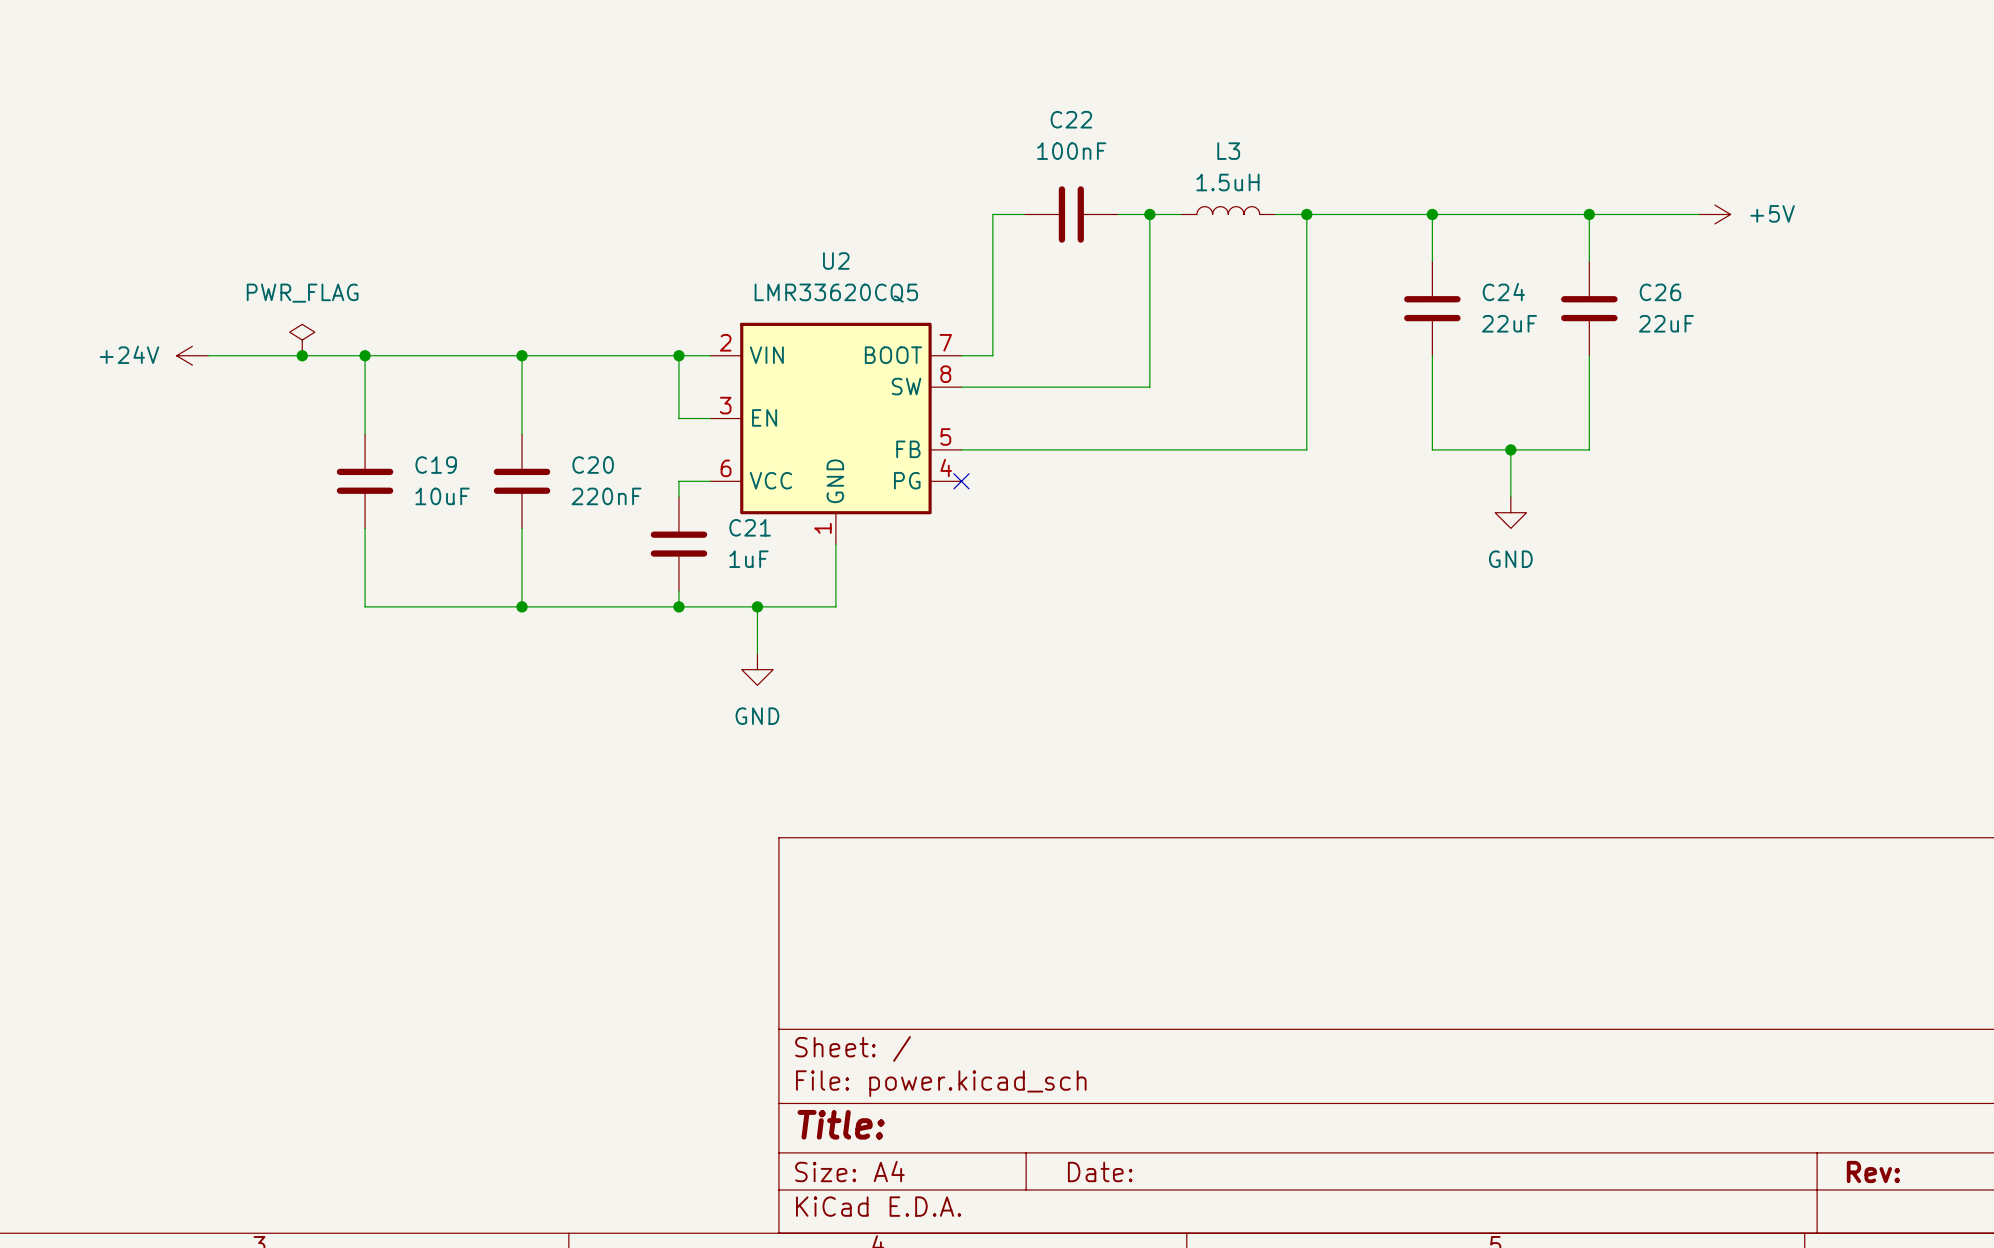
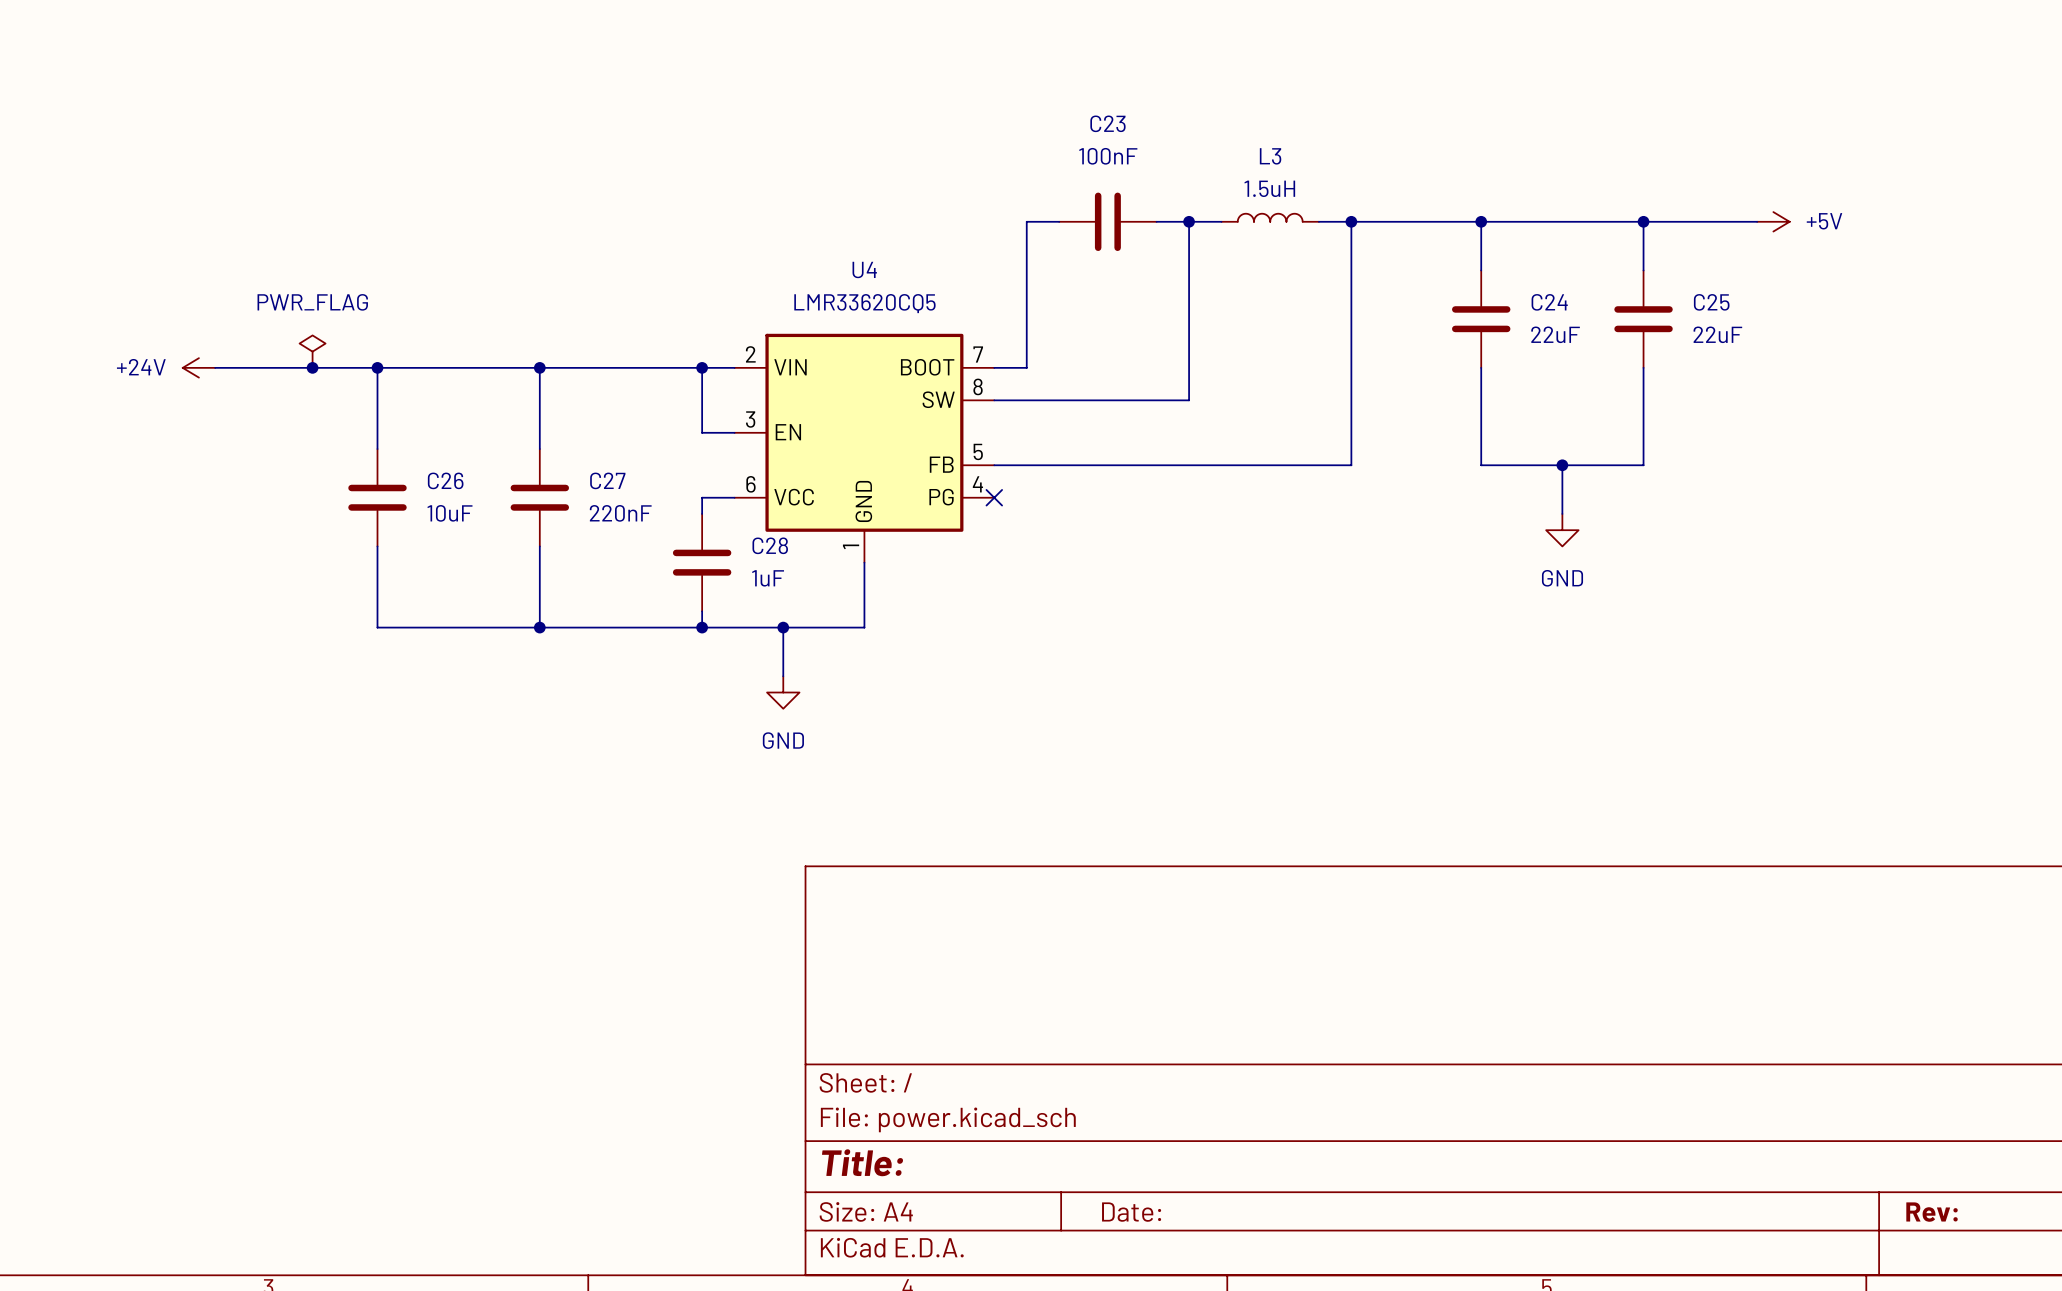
C22 name: C22 (1071, 119) -> C23 (1107, 123)
U2 name: U2 (836, 260) -> U4 (864, 269)
C26 name: C26 (1660, 292) -> C25 (1711, 302)
C19 name: C19 (436, 465) -> C26 (445, 480)
C20 name: C20 (593, 465) -> C27 (607, 480)
C21 name: C21 (750, 527) -> C28 (770, 545)

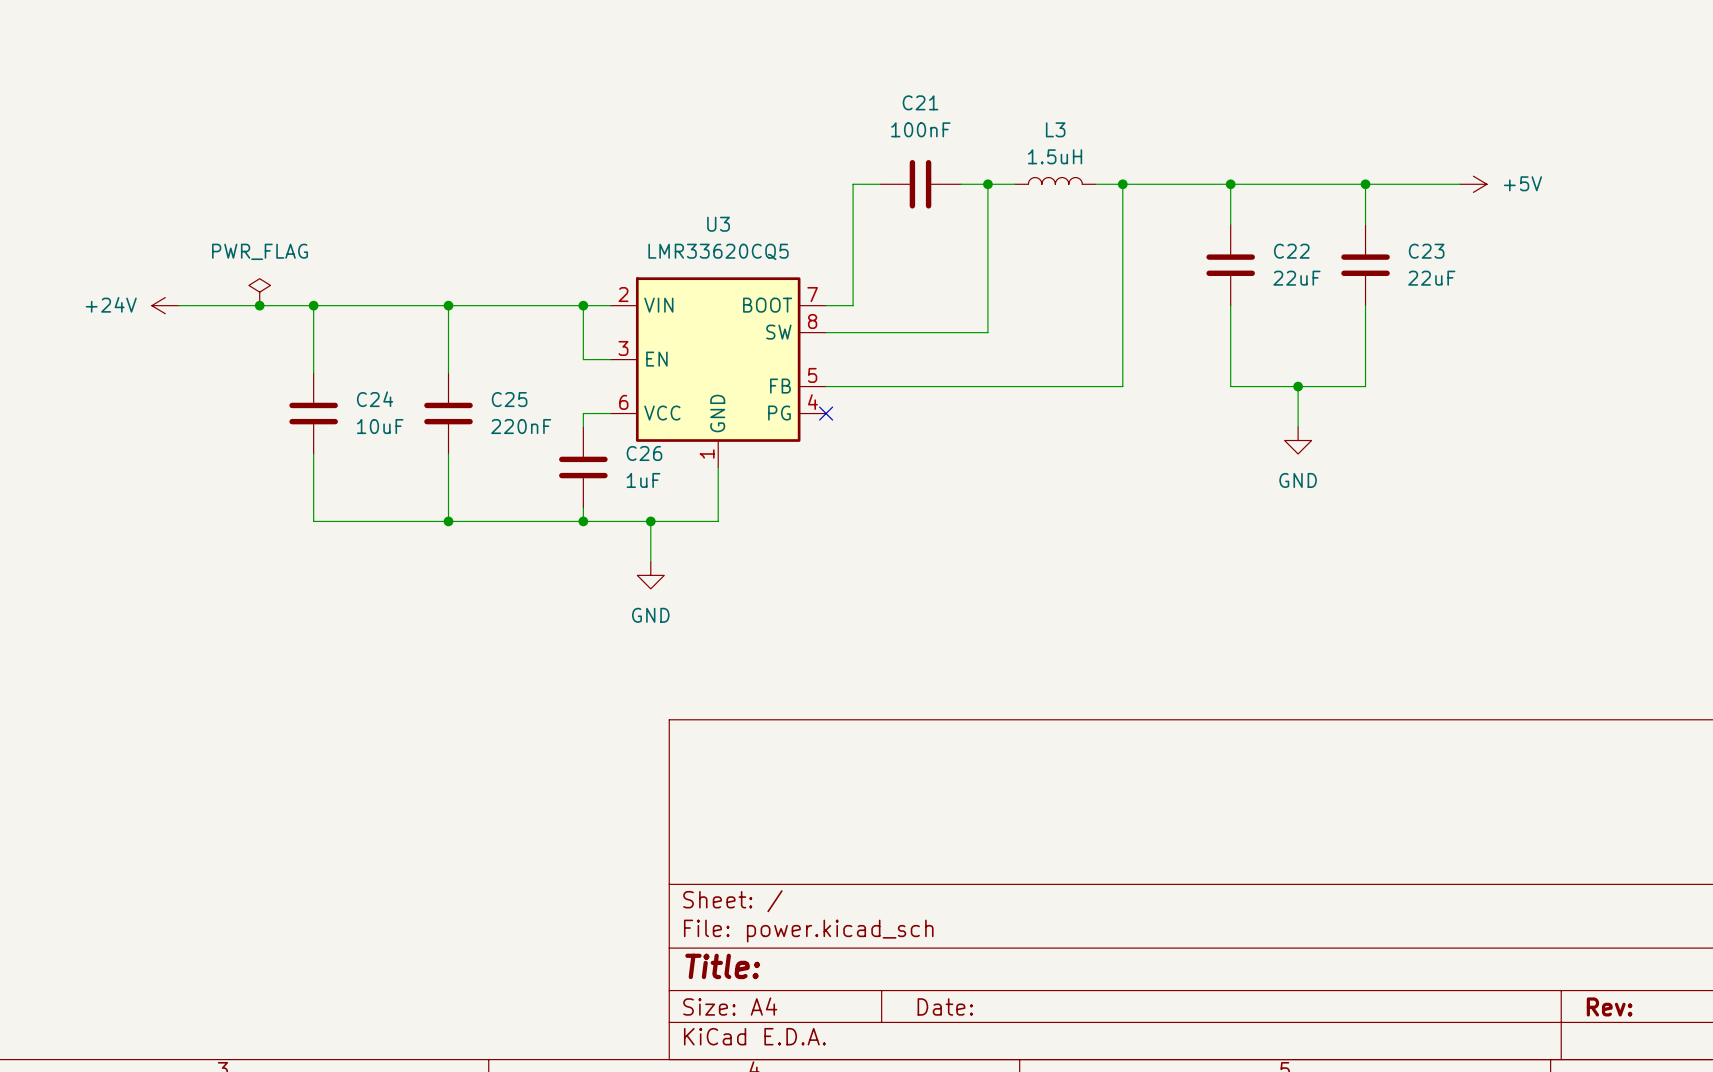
C23 name: C23 (1107, 123) -> C21 (920, 102)
U4 name: U4 (864, 269) -> U3 (718, 224)
C24 name: C24 (1549, 302) -> C22 (1291, 251)
C25 name: C25 (1711, 302) -> C23 (1426, 251)
C26 name: C26 (445, 480) -> C24 (375, 399)
C27 name: C27 (607, 480) -> C25 (509, 399)
C28 name: C28 (770, 545) -> C26 (644, 453)

